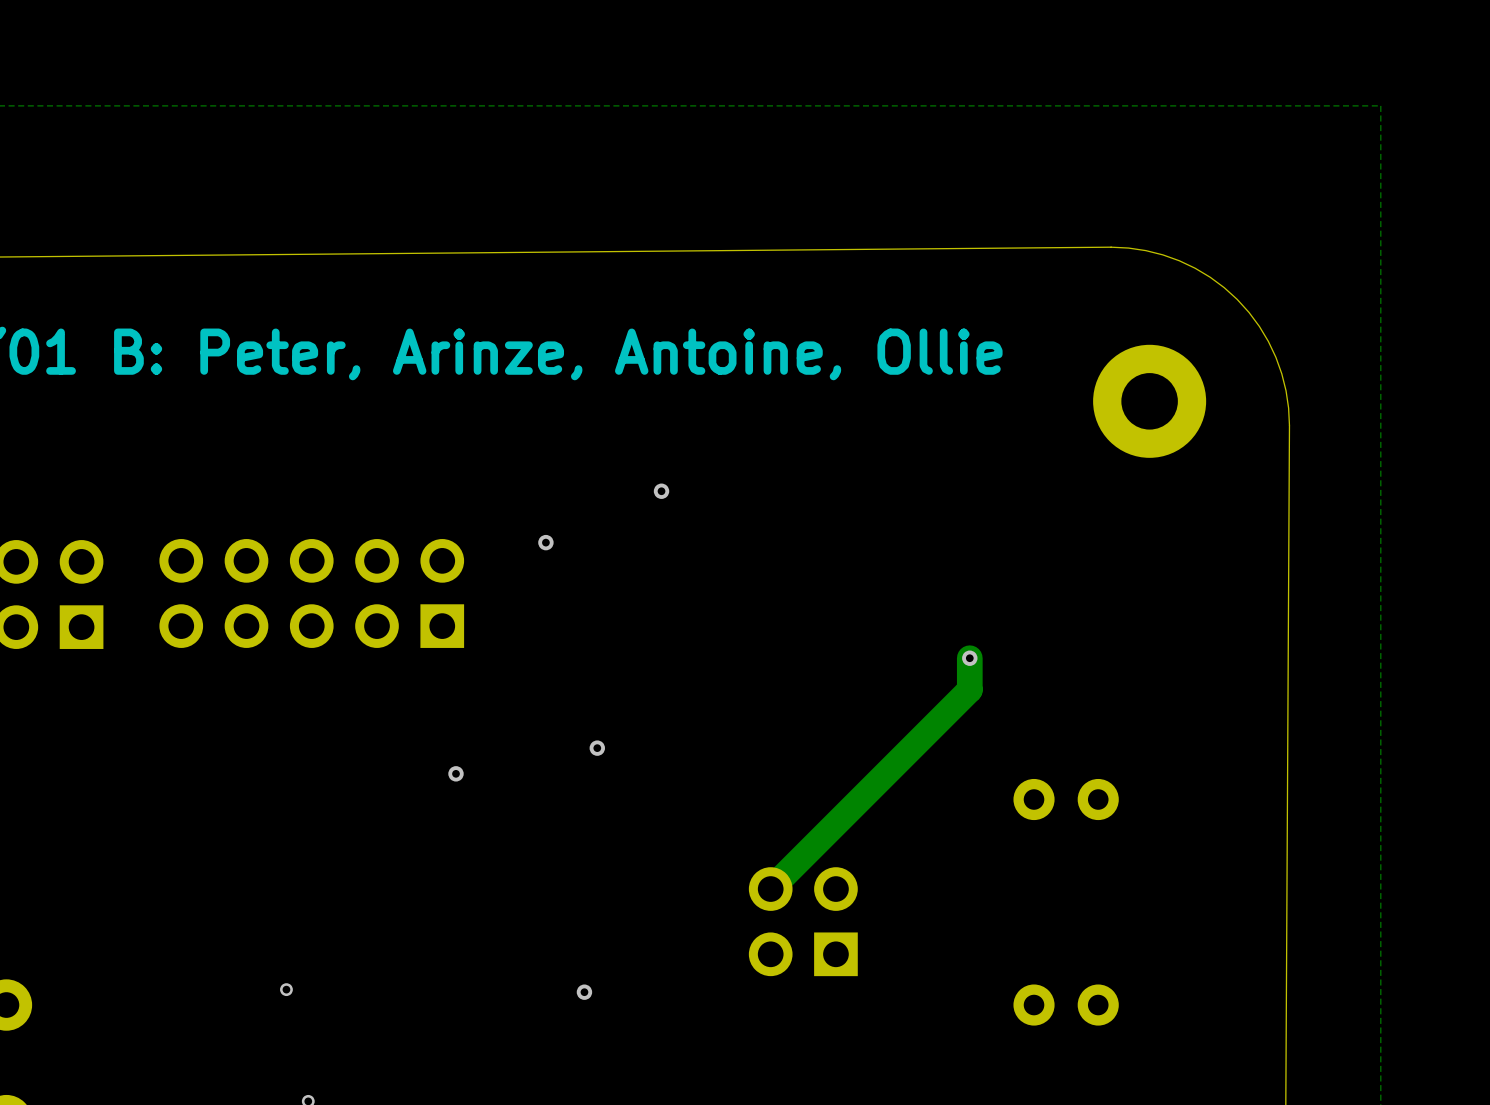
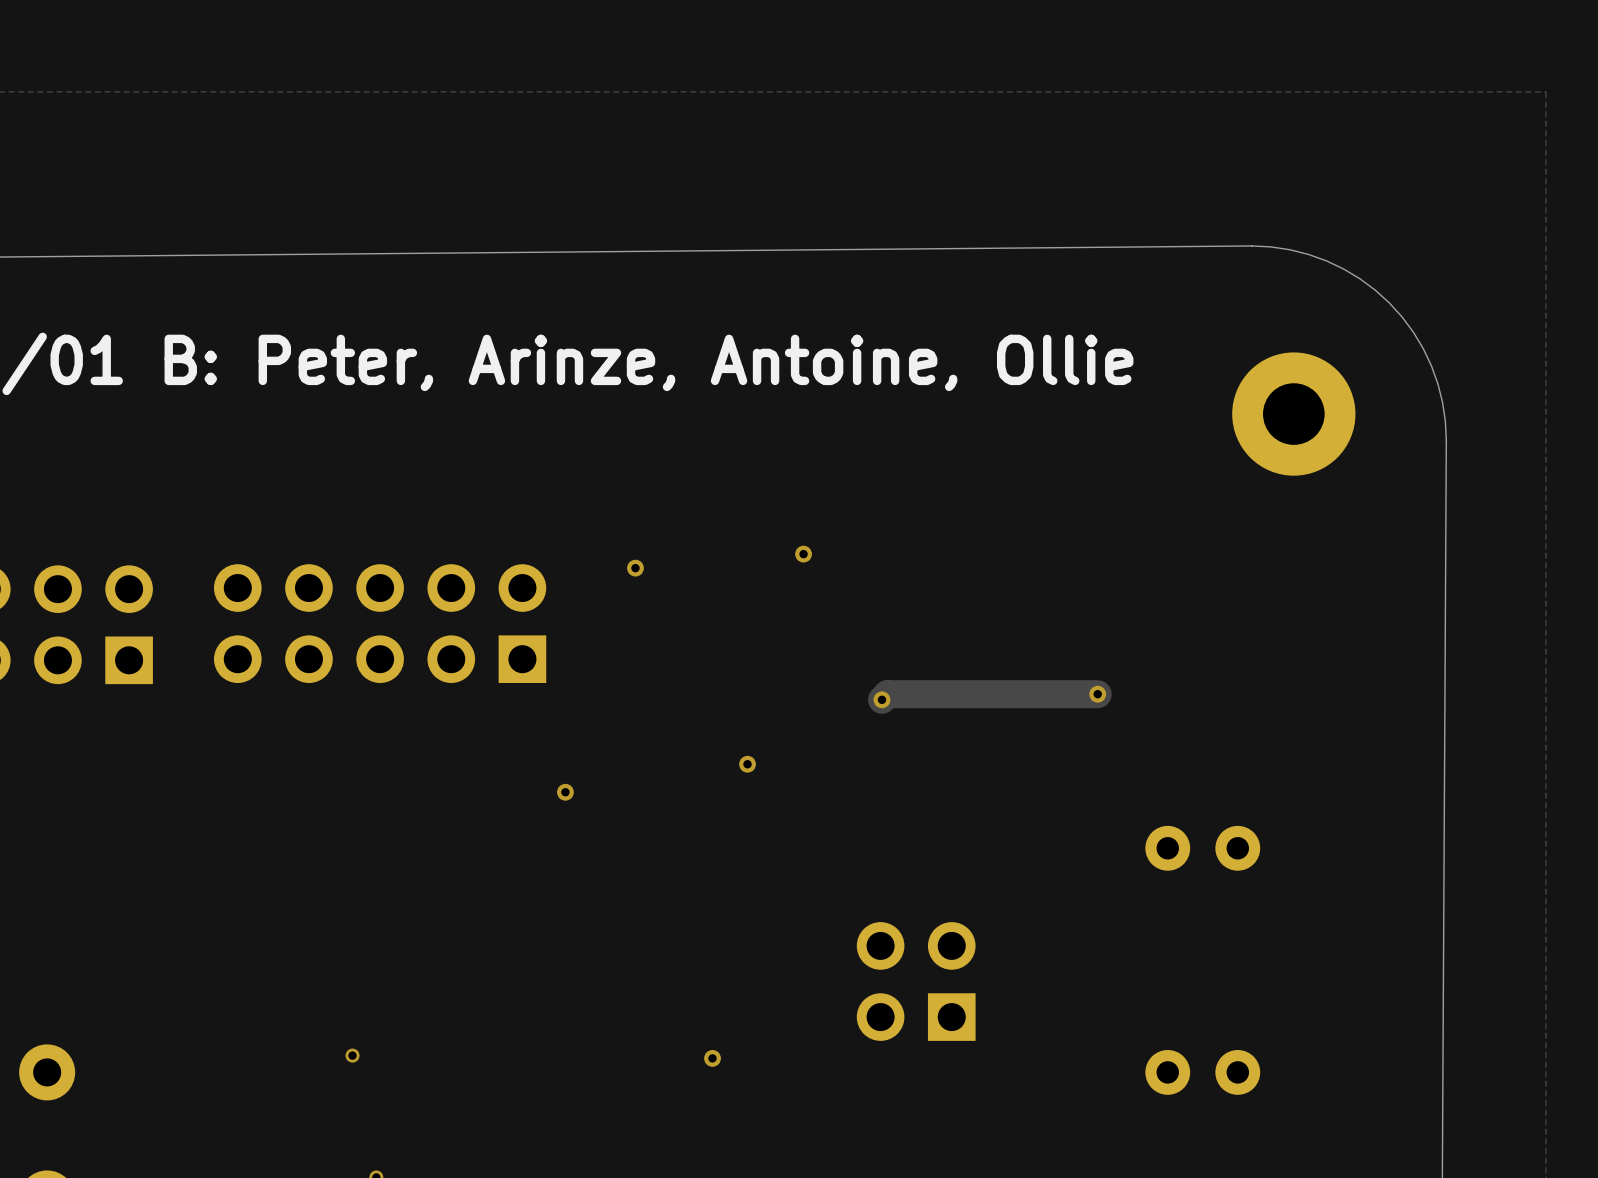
via position: (661, 491) -> (803, 554)
track: (969, 658) (969, 689) (770, 889) -> (1097, 694) (887, 694) (882, 699)
via: none -> (882, 699)
via position: (597, 748) -> (747, 764)
via position: (456, 773) -> (565, 792)
via position: (584, 992) -> (712, 1058)

